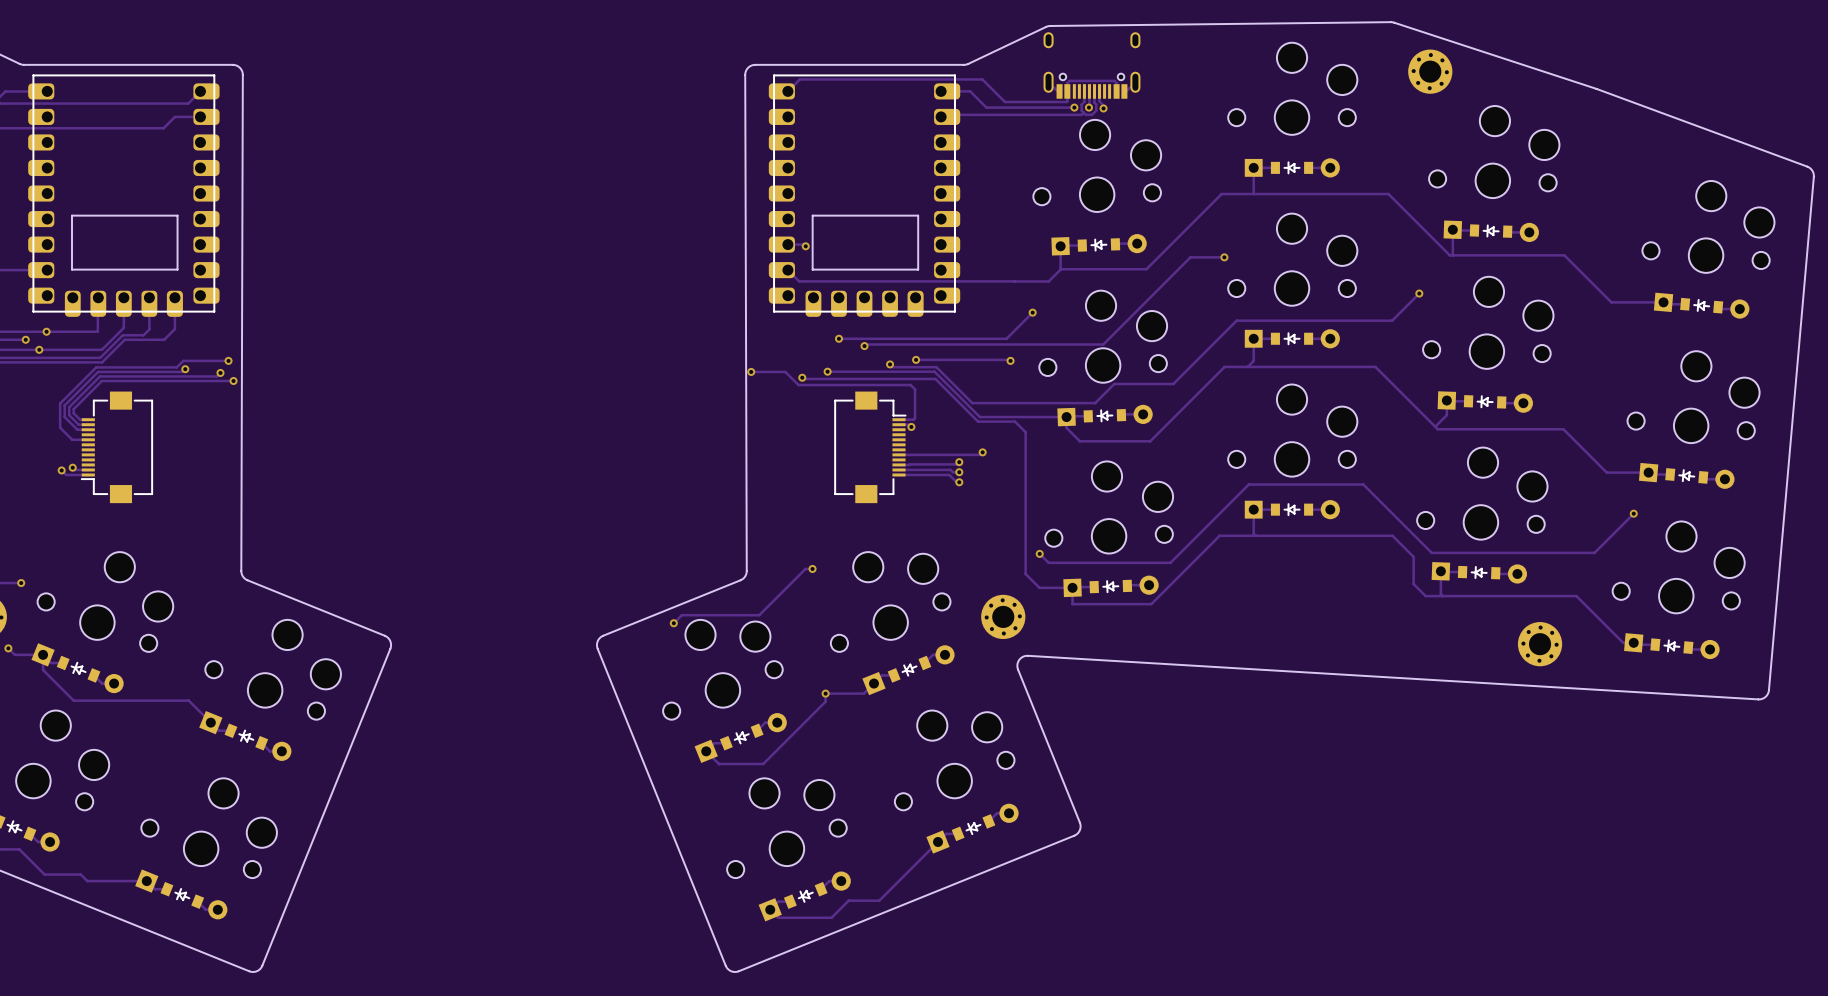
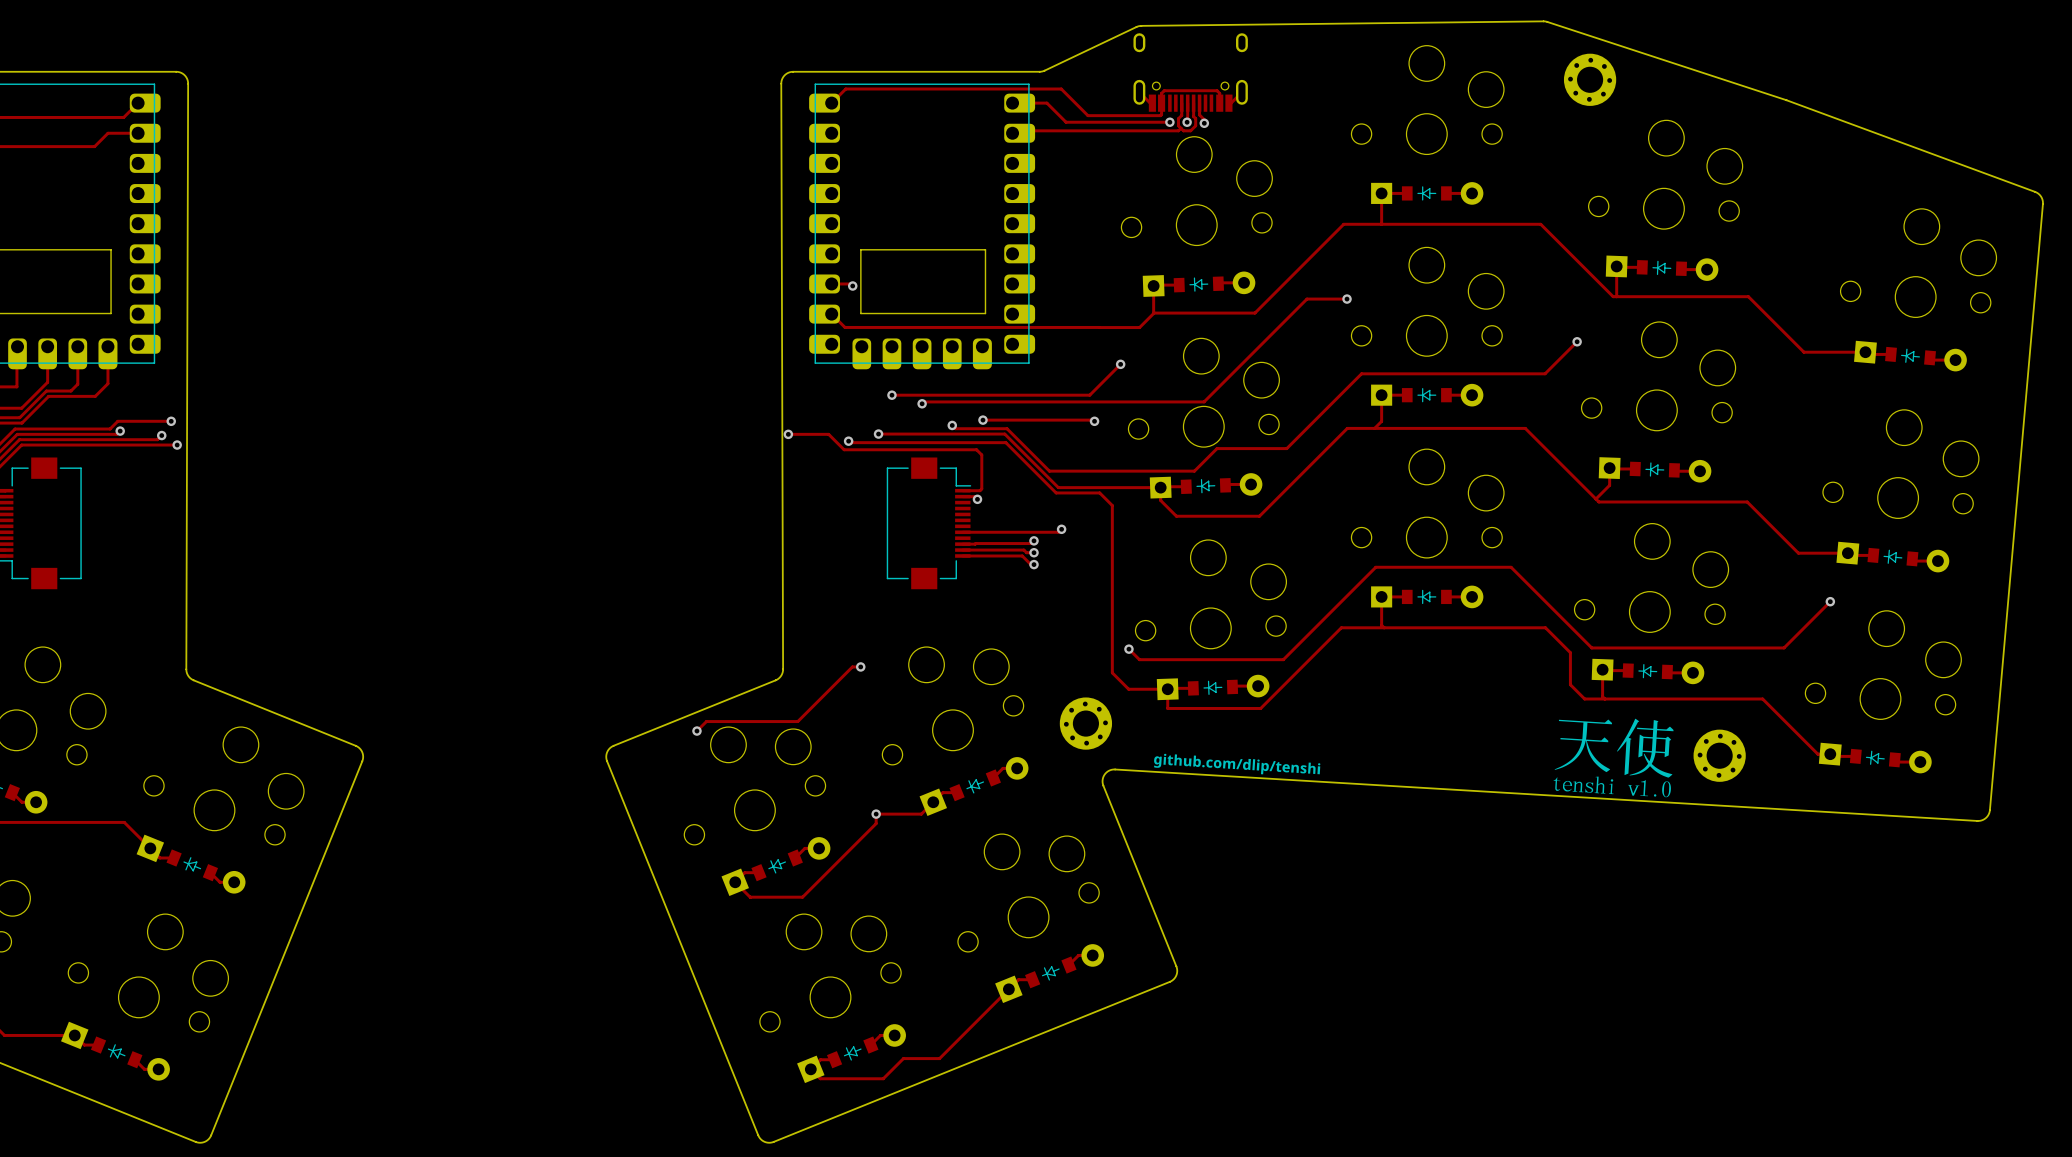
drawing: none -> [1553, 718, 1674, 798]
drawing: none -> [1154, 753, 1321, 775]

